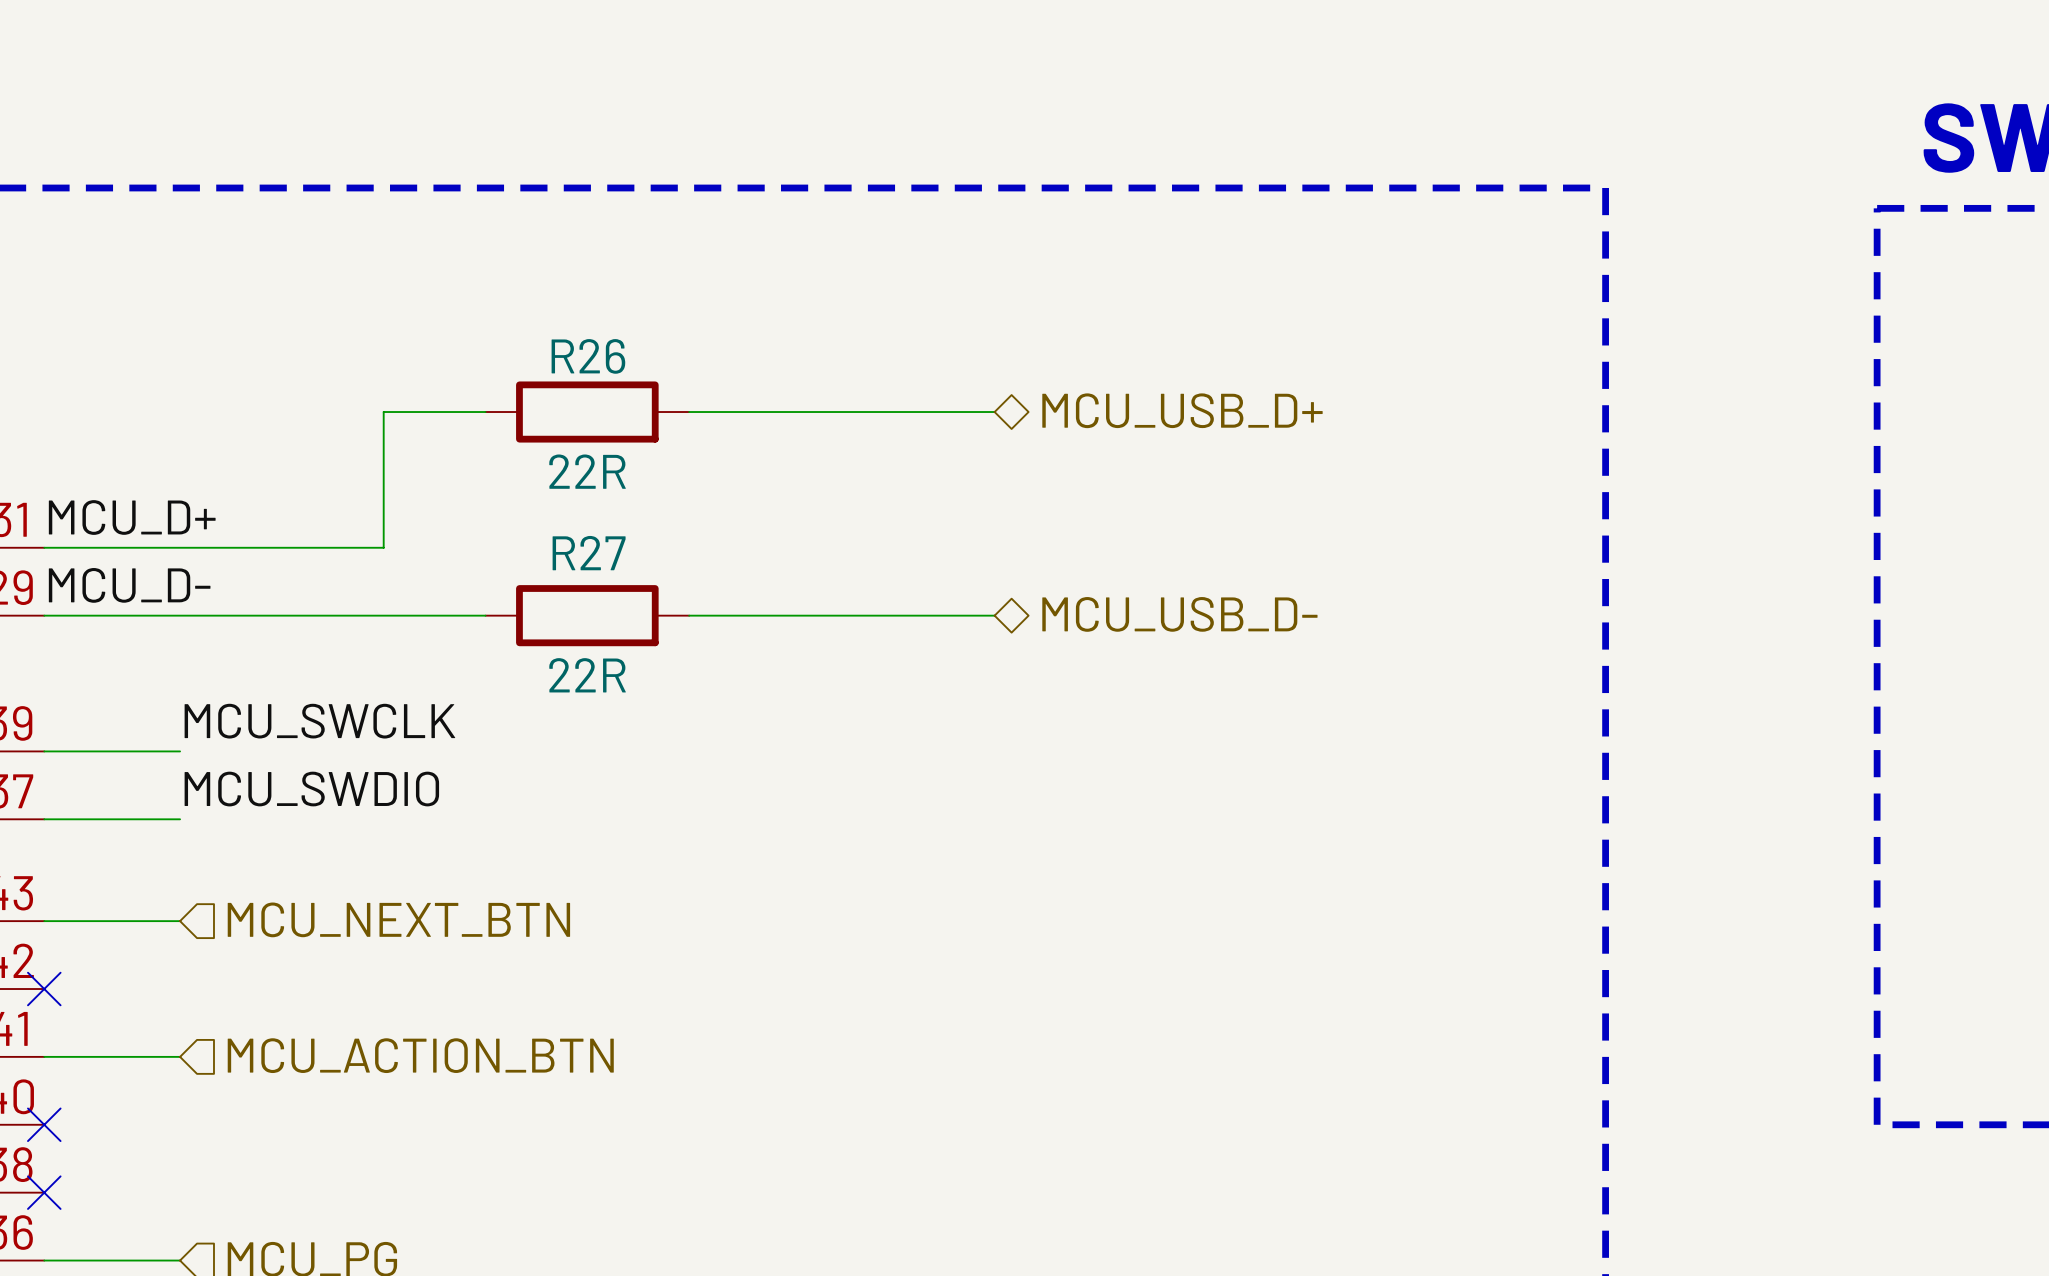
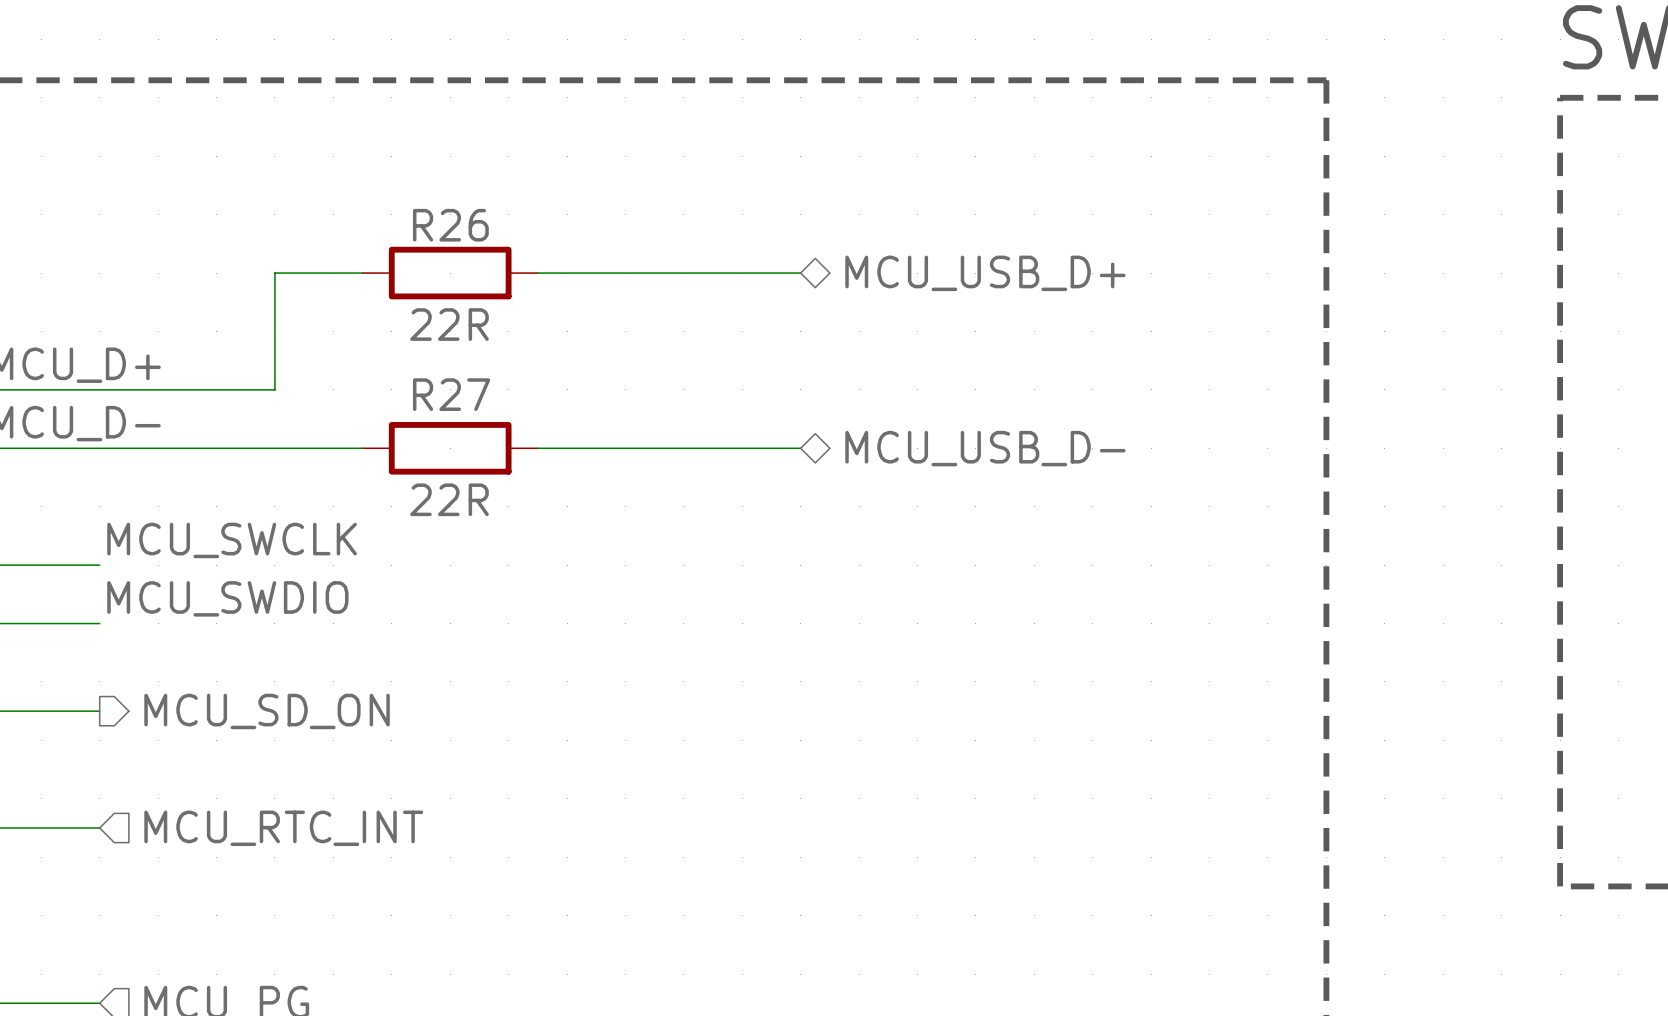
hierarchical label shape: input (398, 919) -> output (267, 711)
hierarchical label: MCU_NEXT_BTN (398, 919) -> MCU_SD_ON (267, 711)
hierarchical label: MCU_ACTION_BTN (420, 1055) -> MCU_RTC_INT (283, 828)

